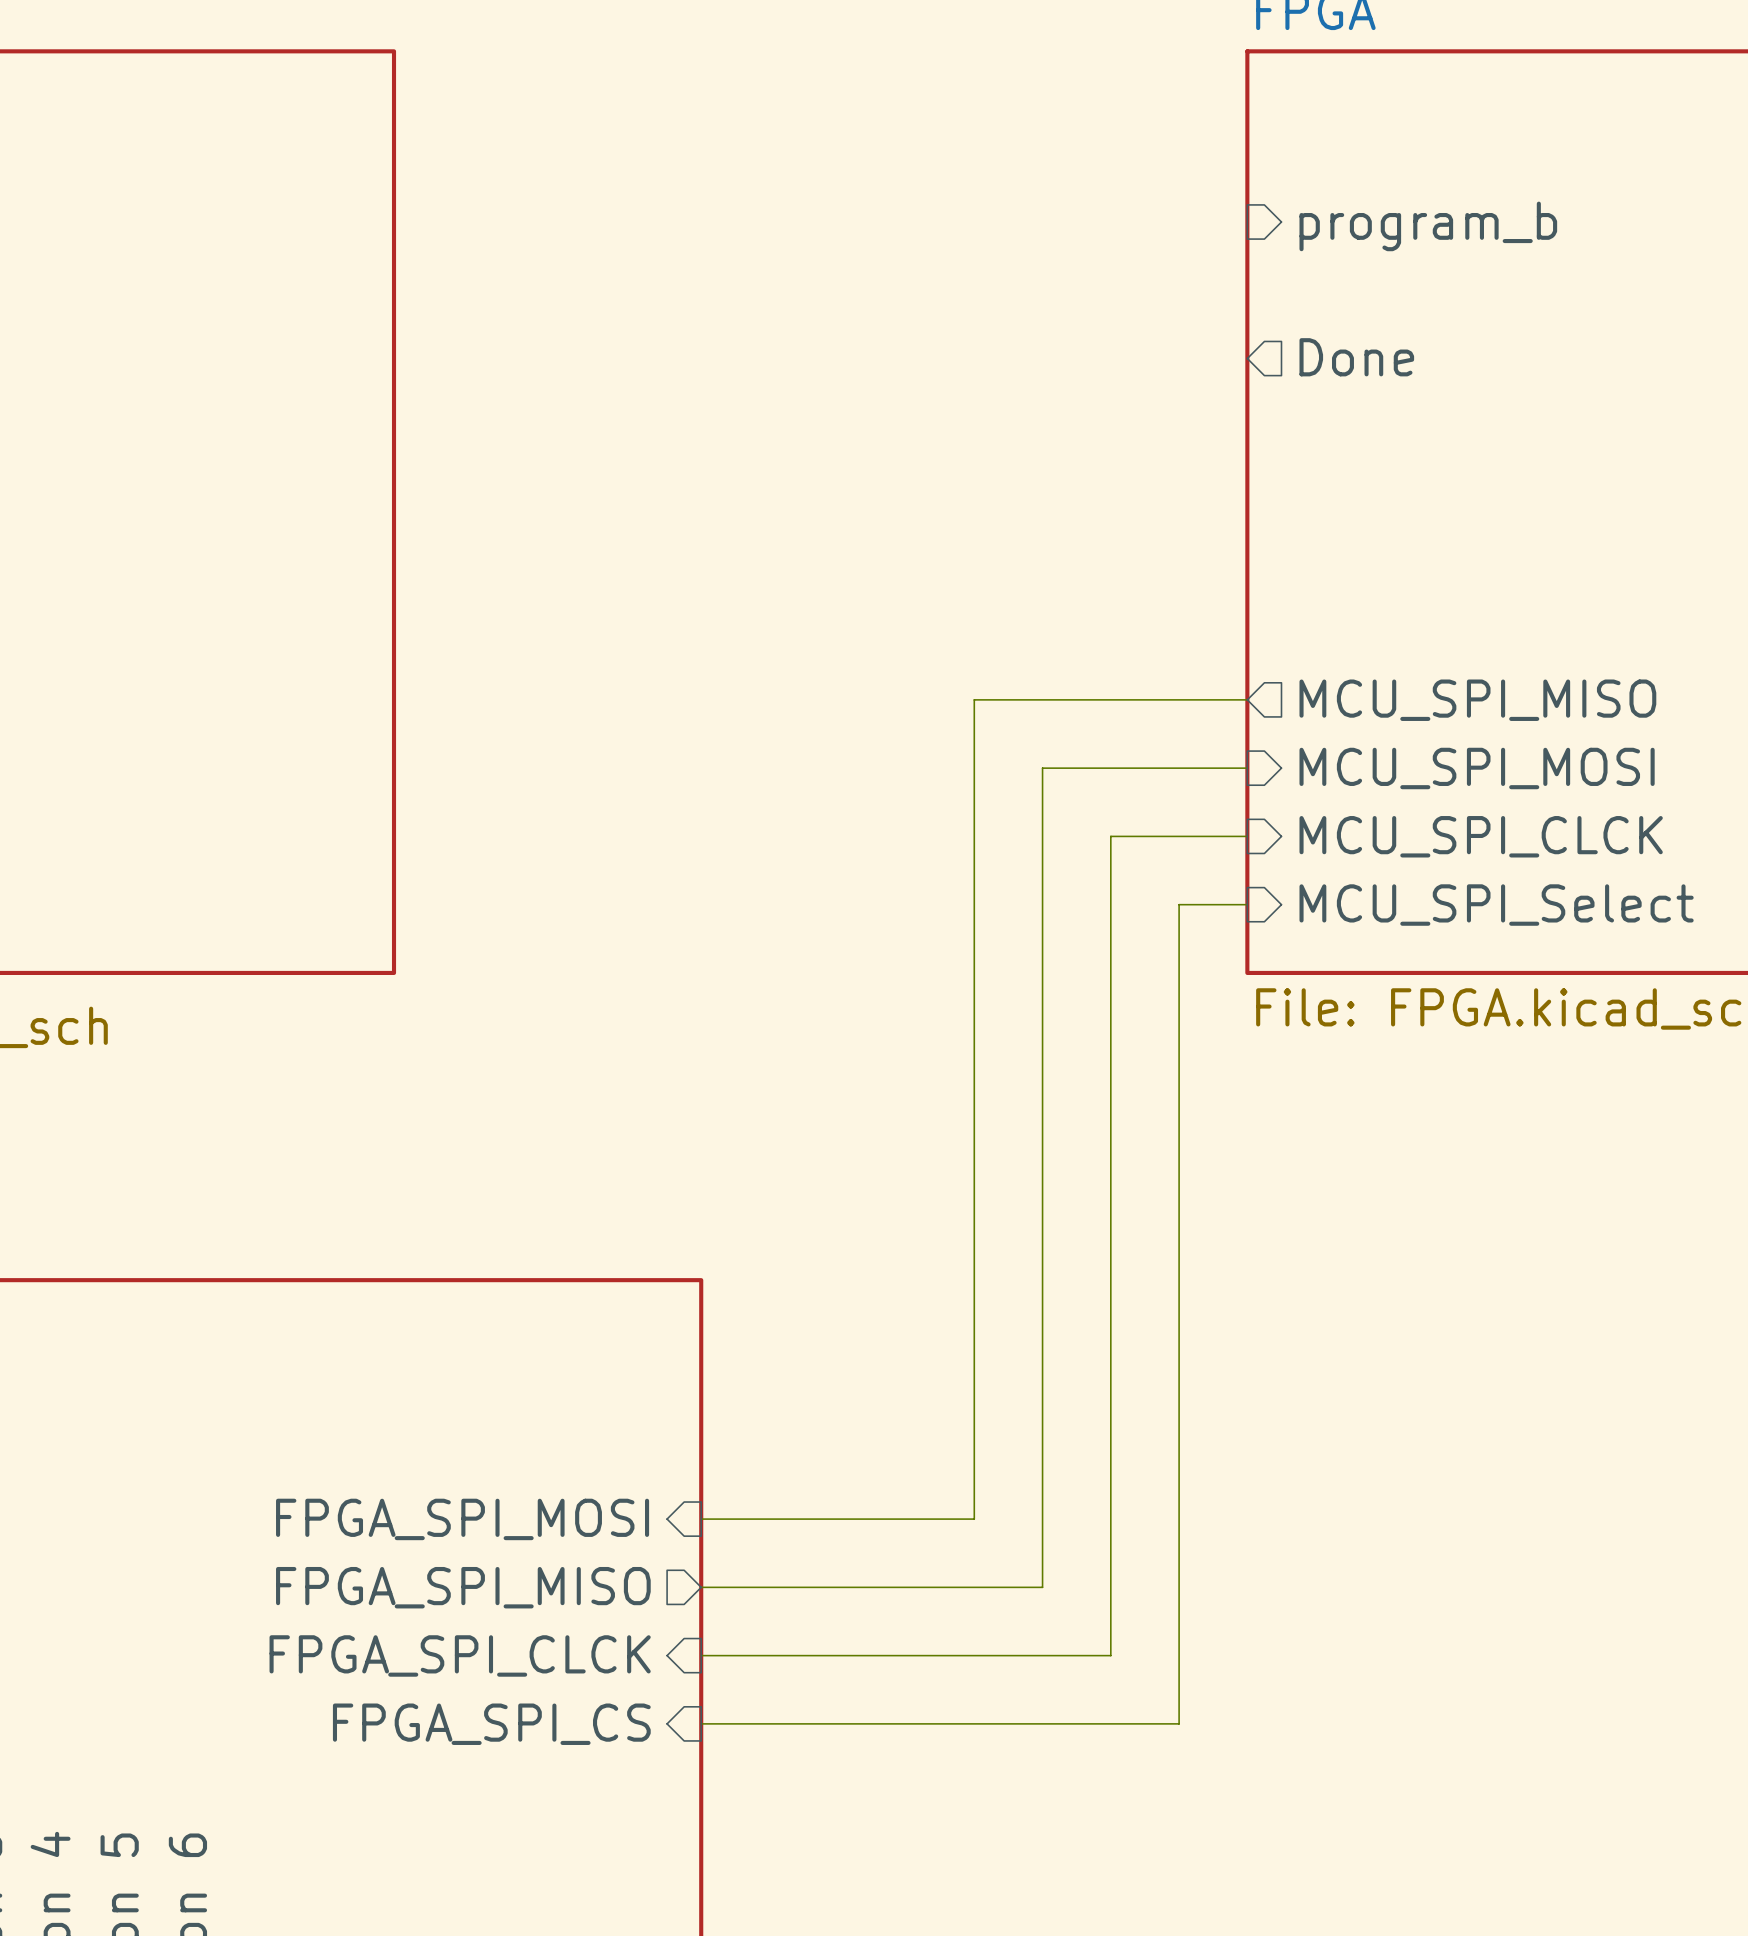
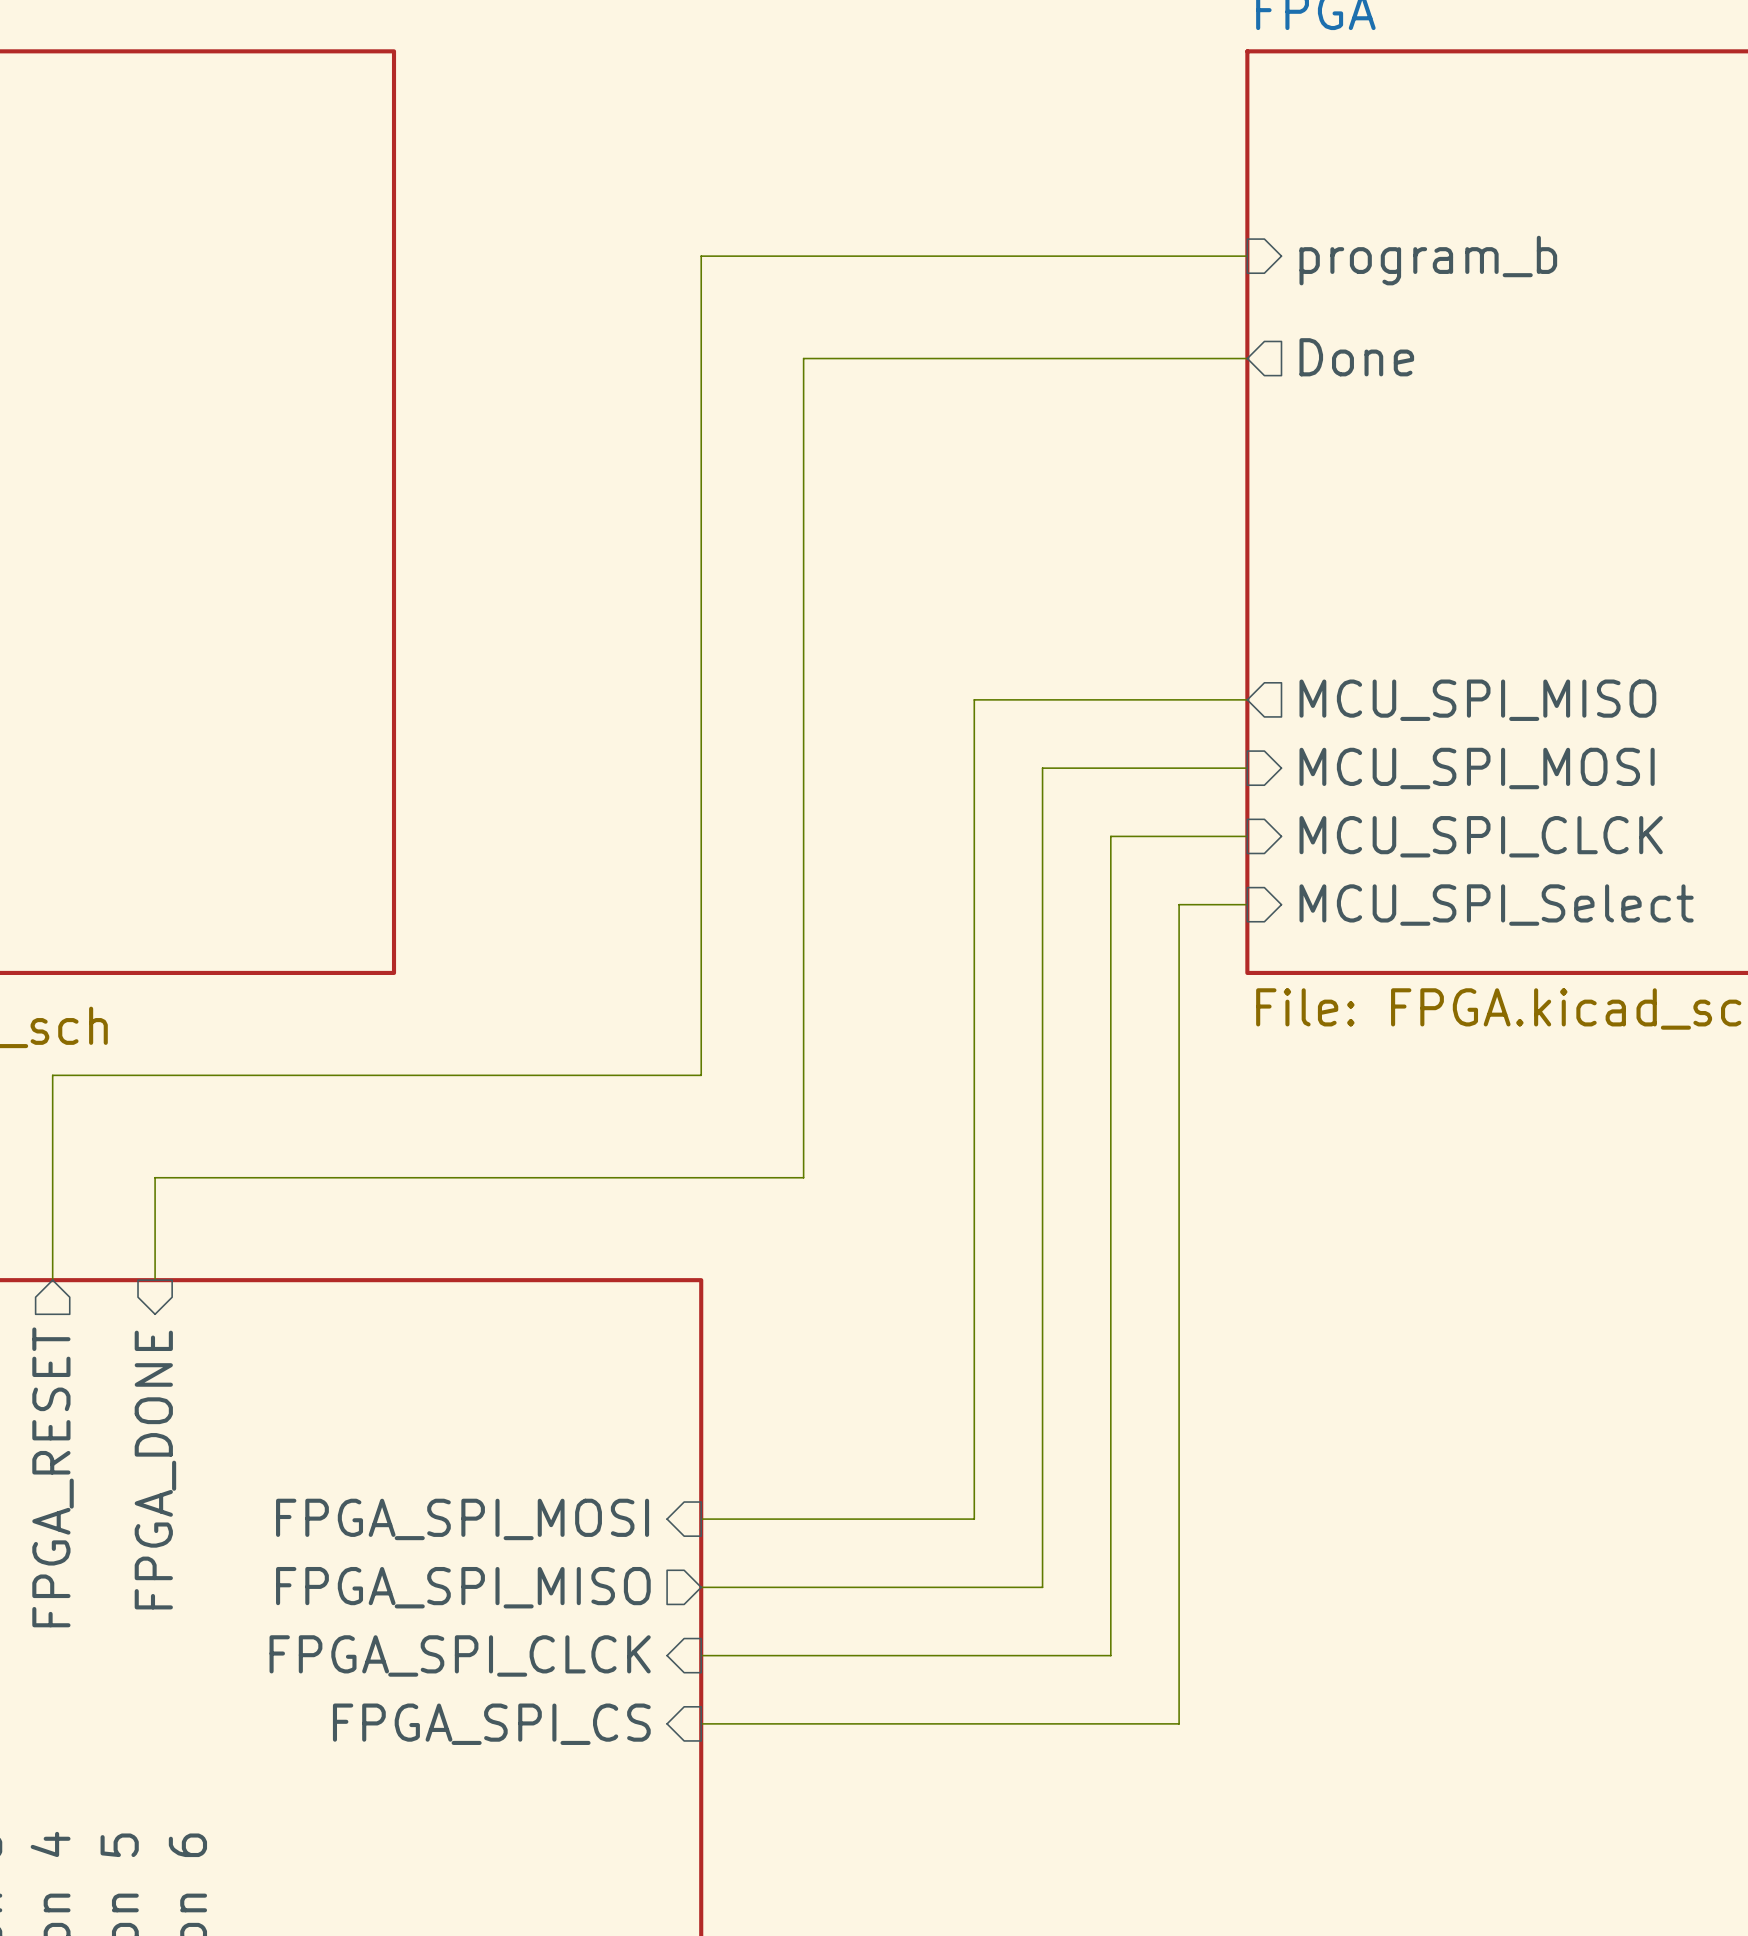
sheet pin position: program_b (1428, 226) -> program_b (1428, 260)
wire: none -> (1247, 256) (701, 256) (701, 1075) (52, 1075) (52, 1280)
wire: none -> (1247, 358) (803, 358) (803, 1177) (155, 1177) (155, 1280)
sheet pin: none -> FPGA_DONE (155, 1470)
sheet pin: none -> FPGA_RESET (53, 1477)

